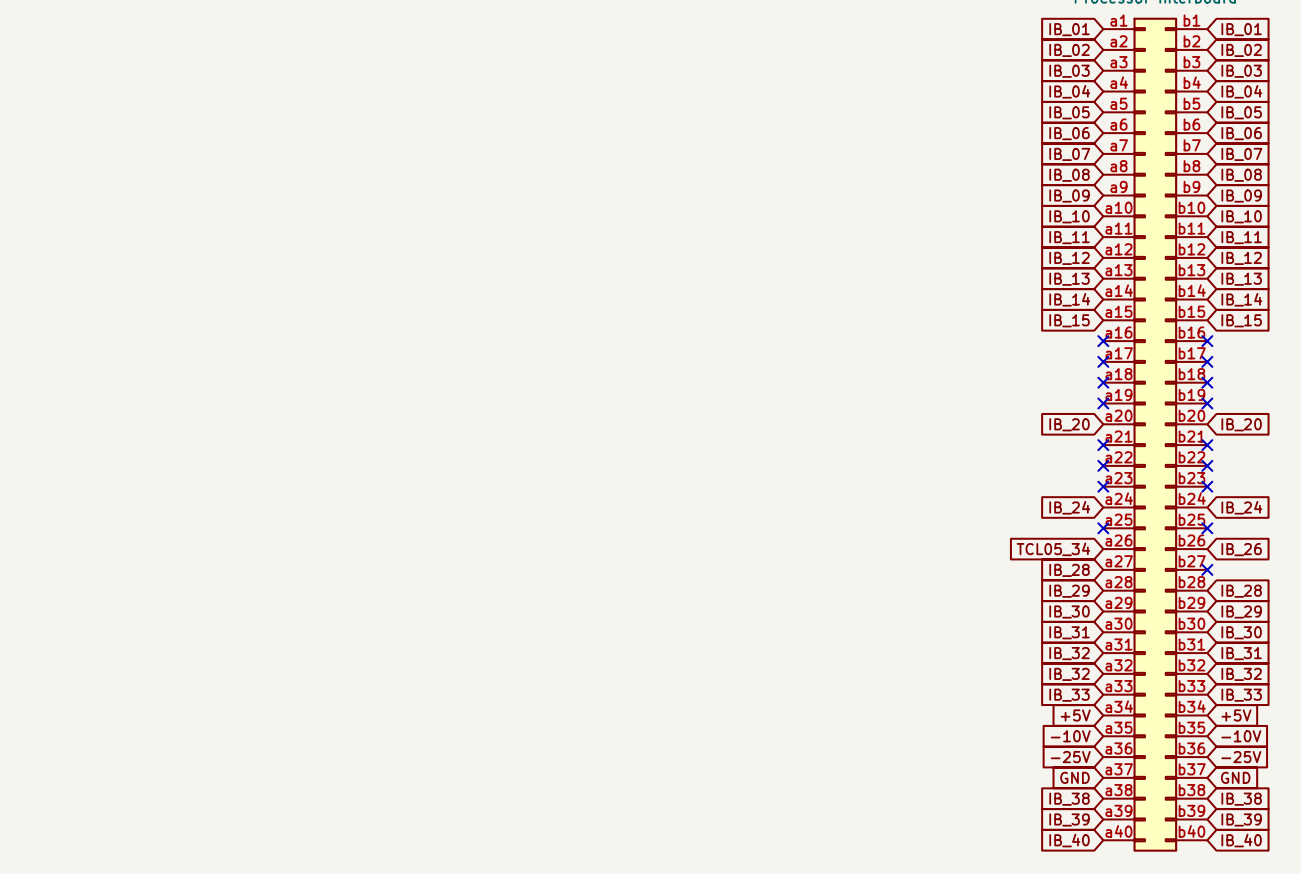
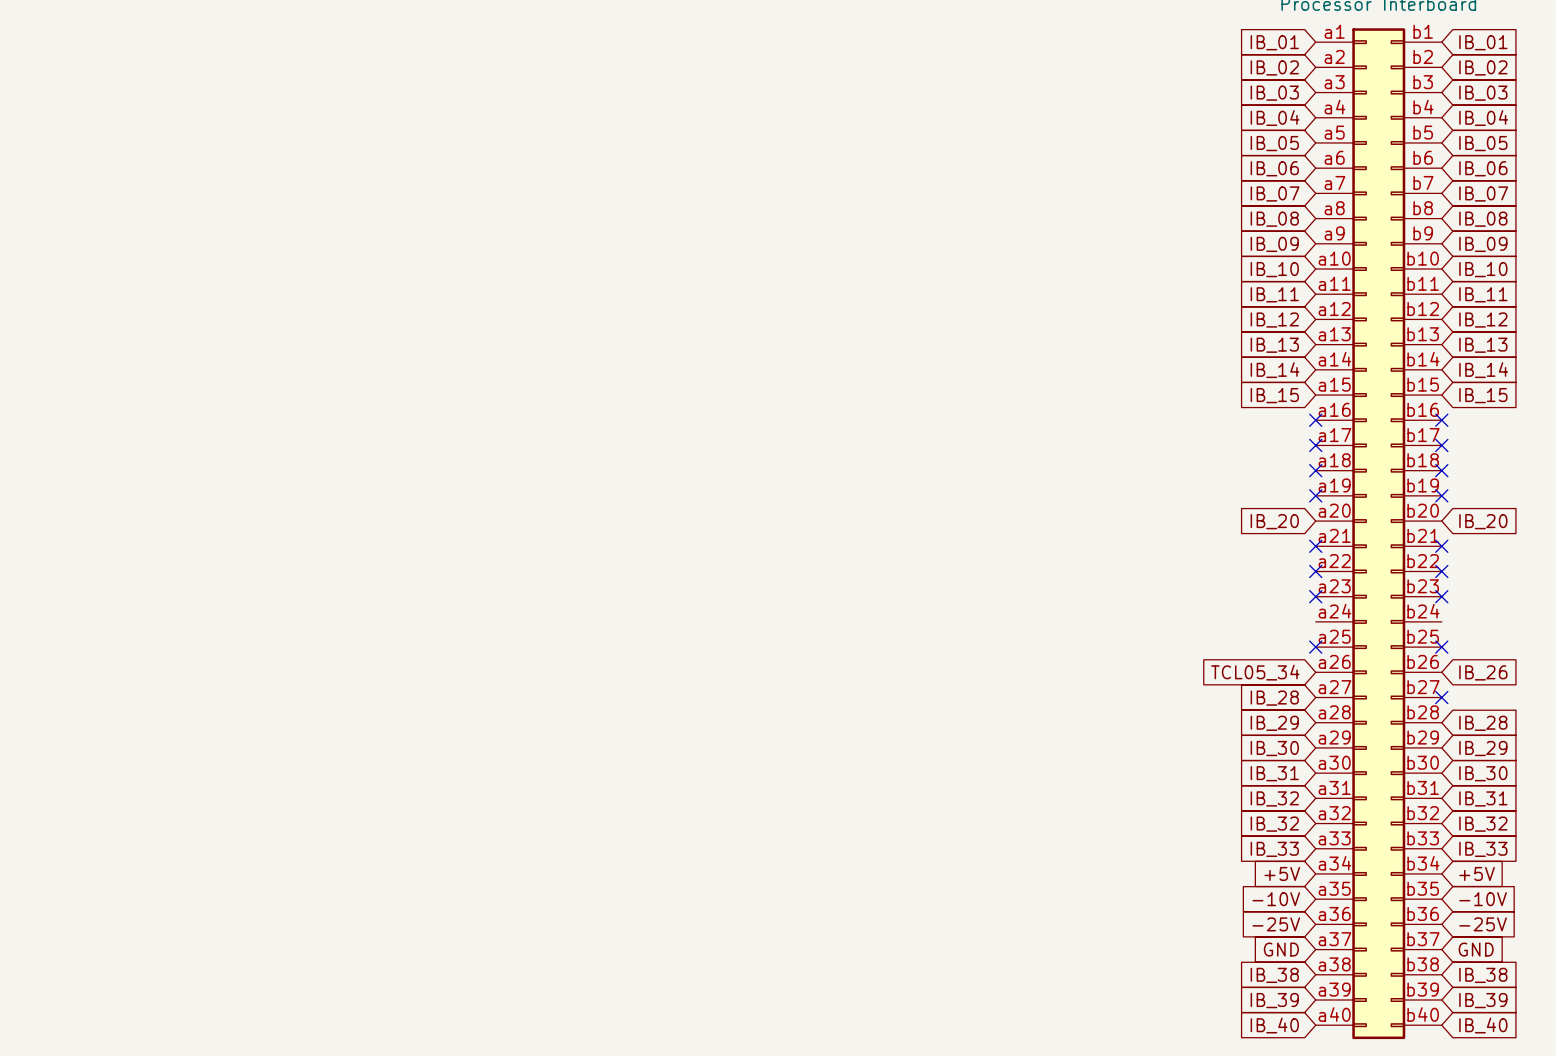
global label: IB_24 (1069, 507) -> none
global label: IB_24 (1241, 507) -> none

